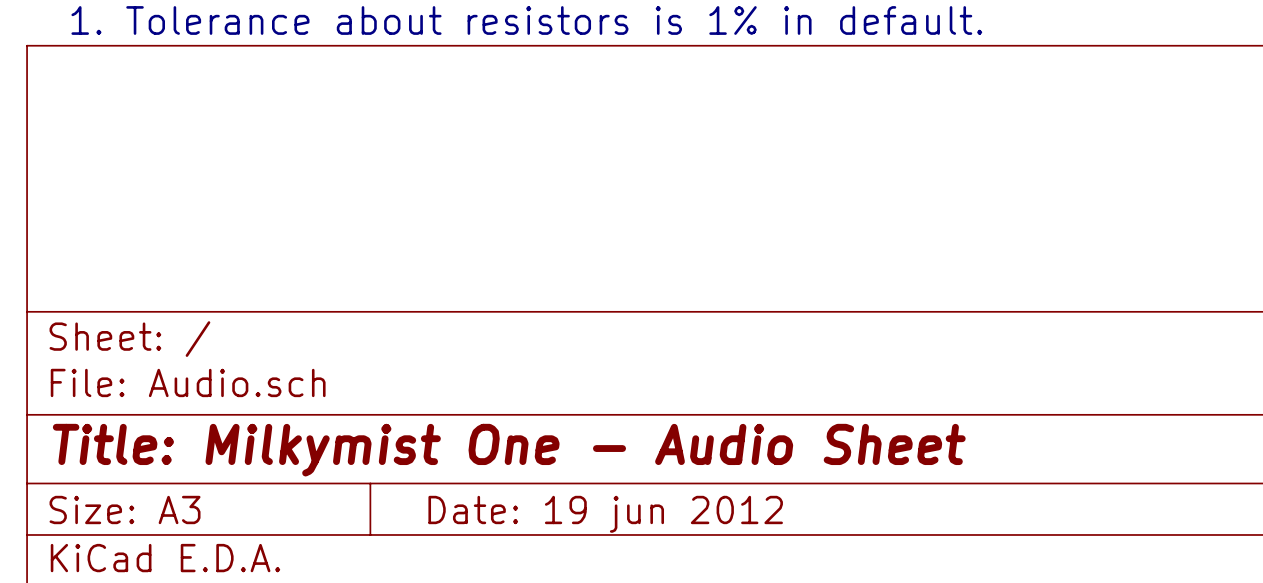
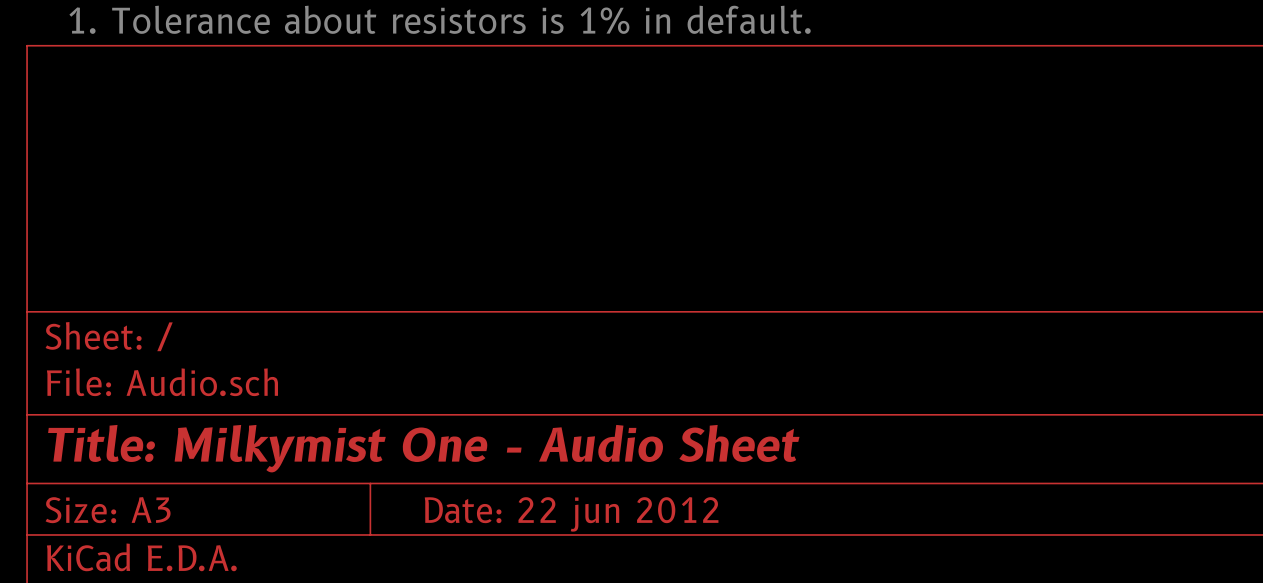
title block: Date: 19 jun 2012 (605, 514) -> Date: 22 jun 2012 (571, 514)

